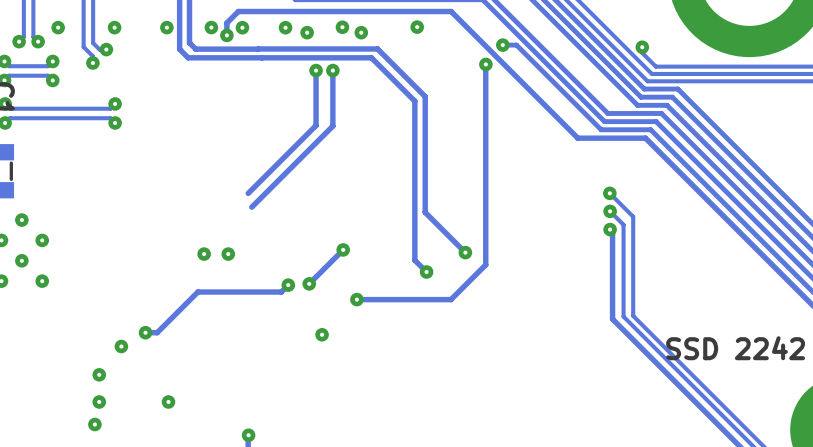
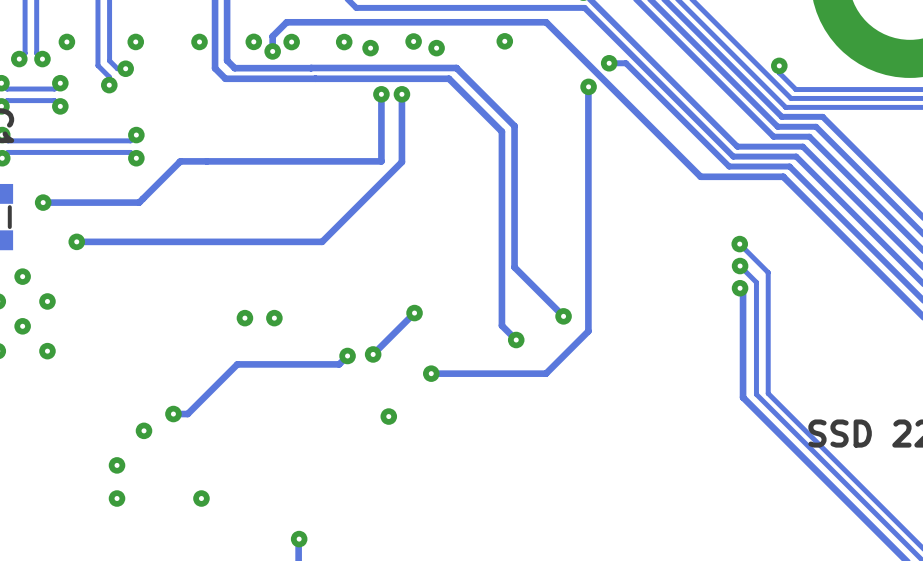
track: (316, 125) (248, 193) -> (381, 161) (180, 161) (139, 202) (43, 202)
via: none -> (43, 202)
via: none -> (76, 241)
track: (267, 191) (251, 207) -> (322, 241) (76, 241)
via: (94, 424) -> none

